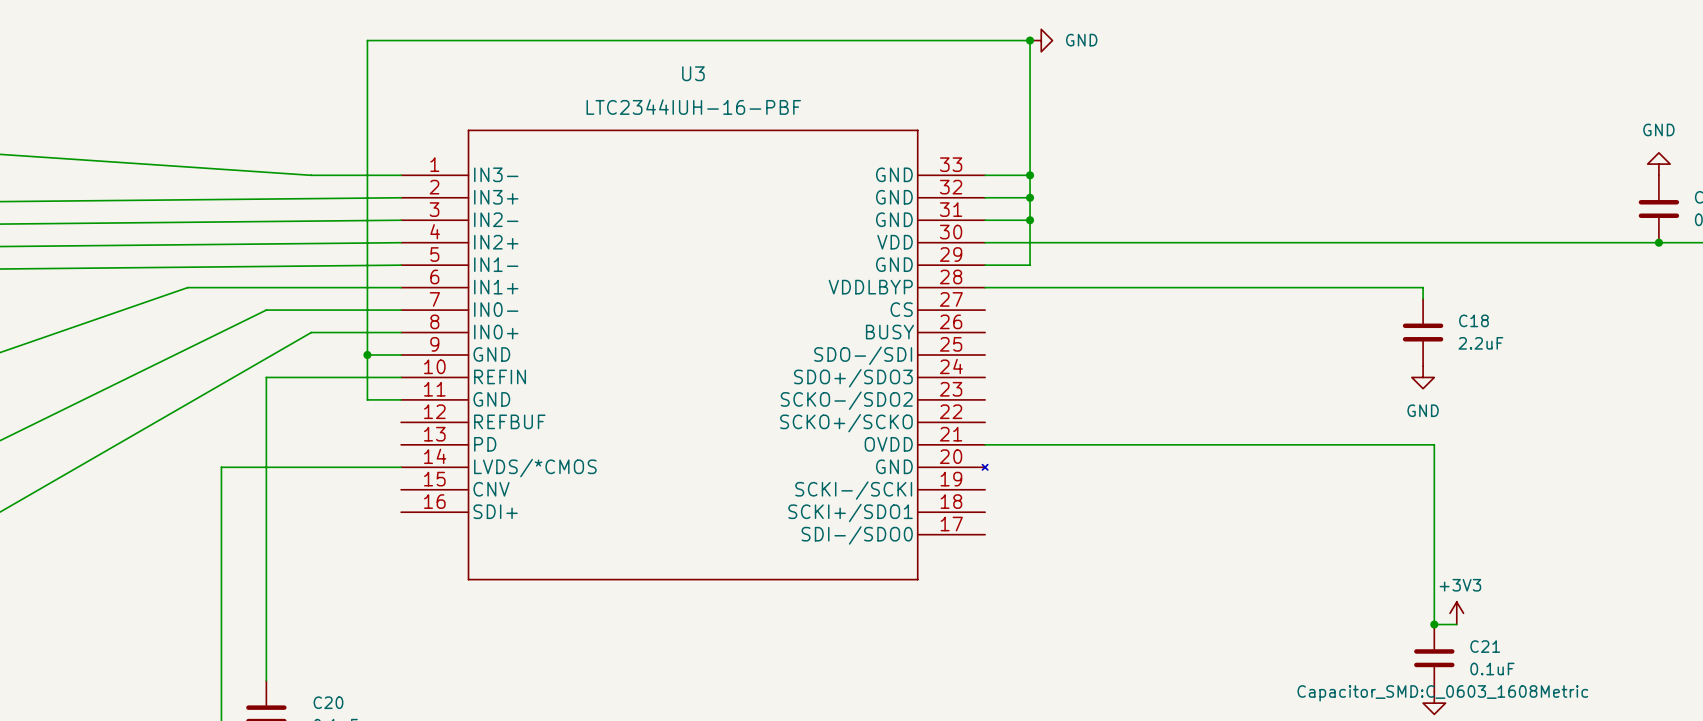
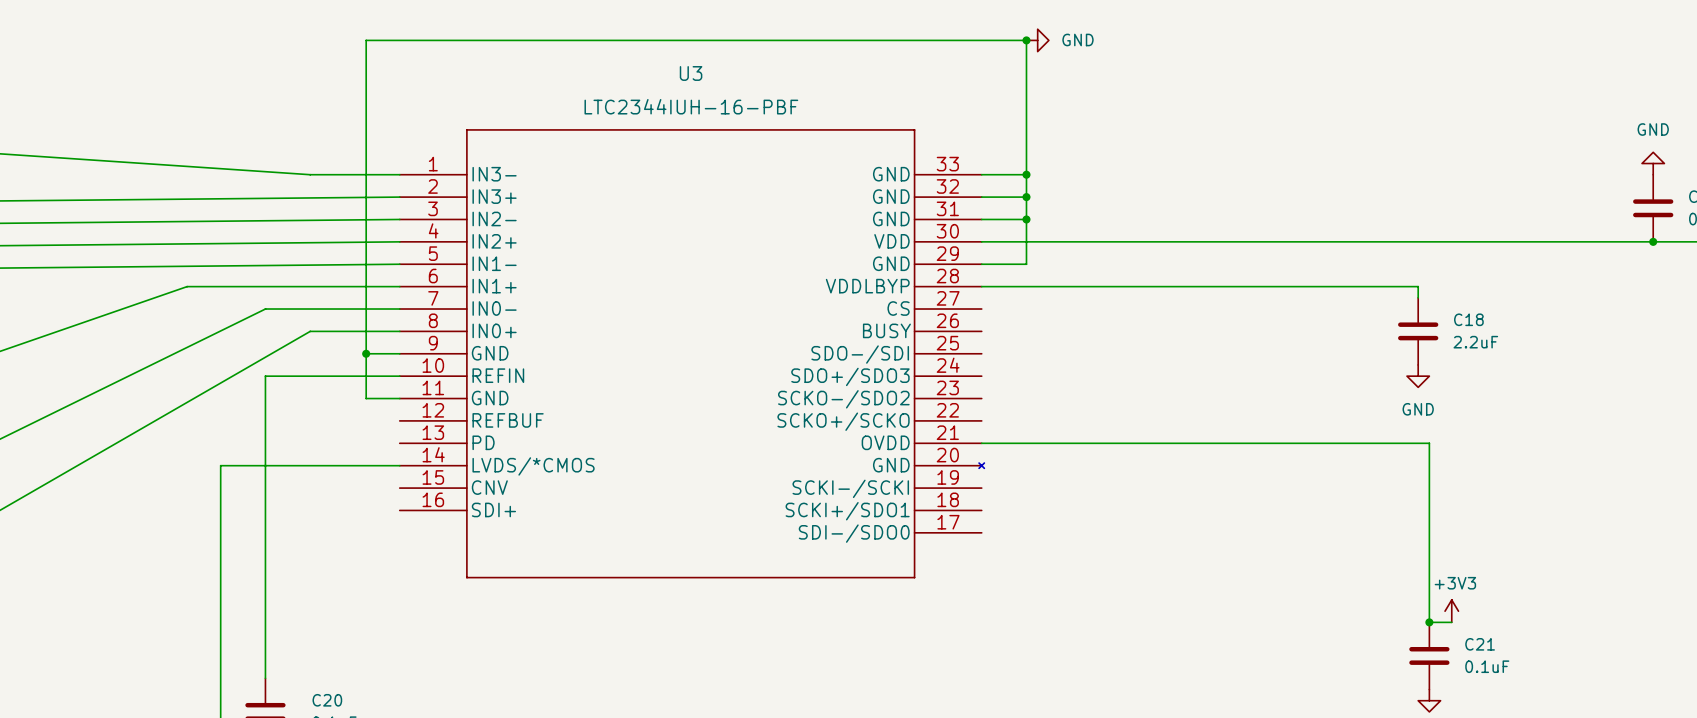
C21 text: Capacitor_SMD:C_0603_1608Metric (1442, 693) -> none

